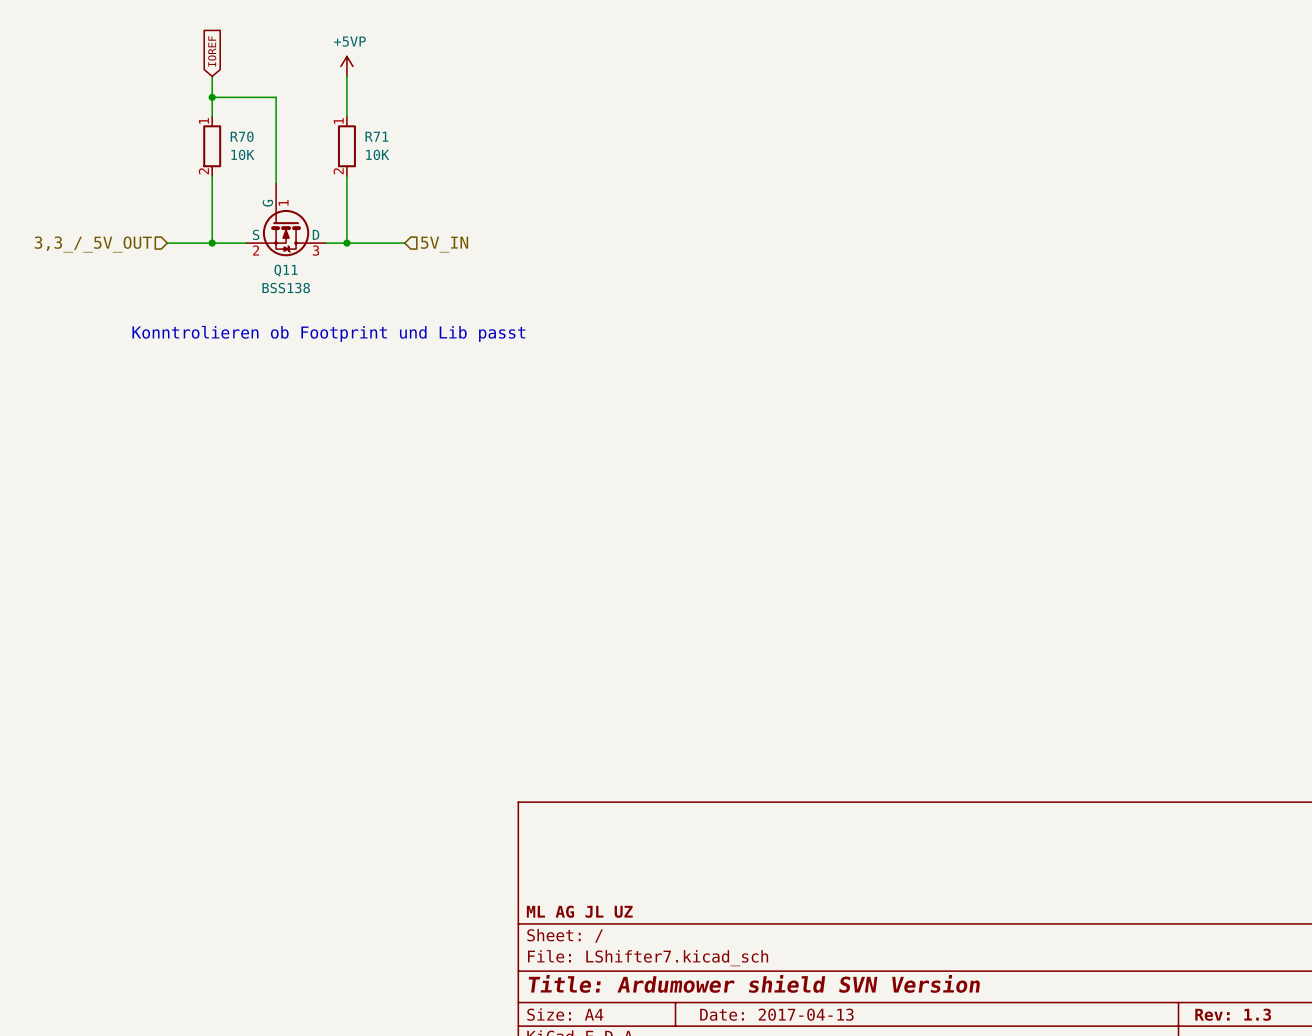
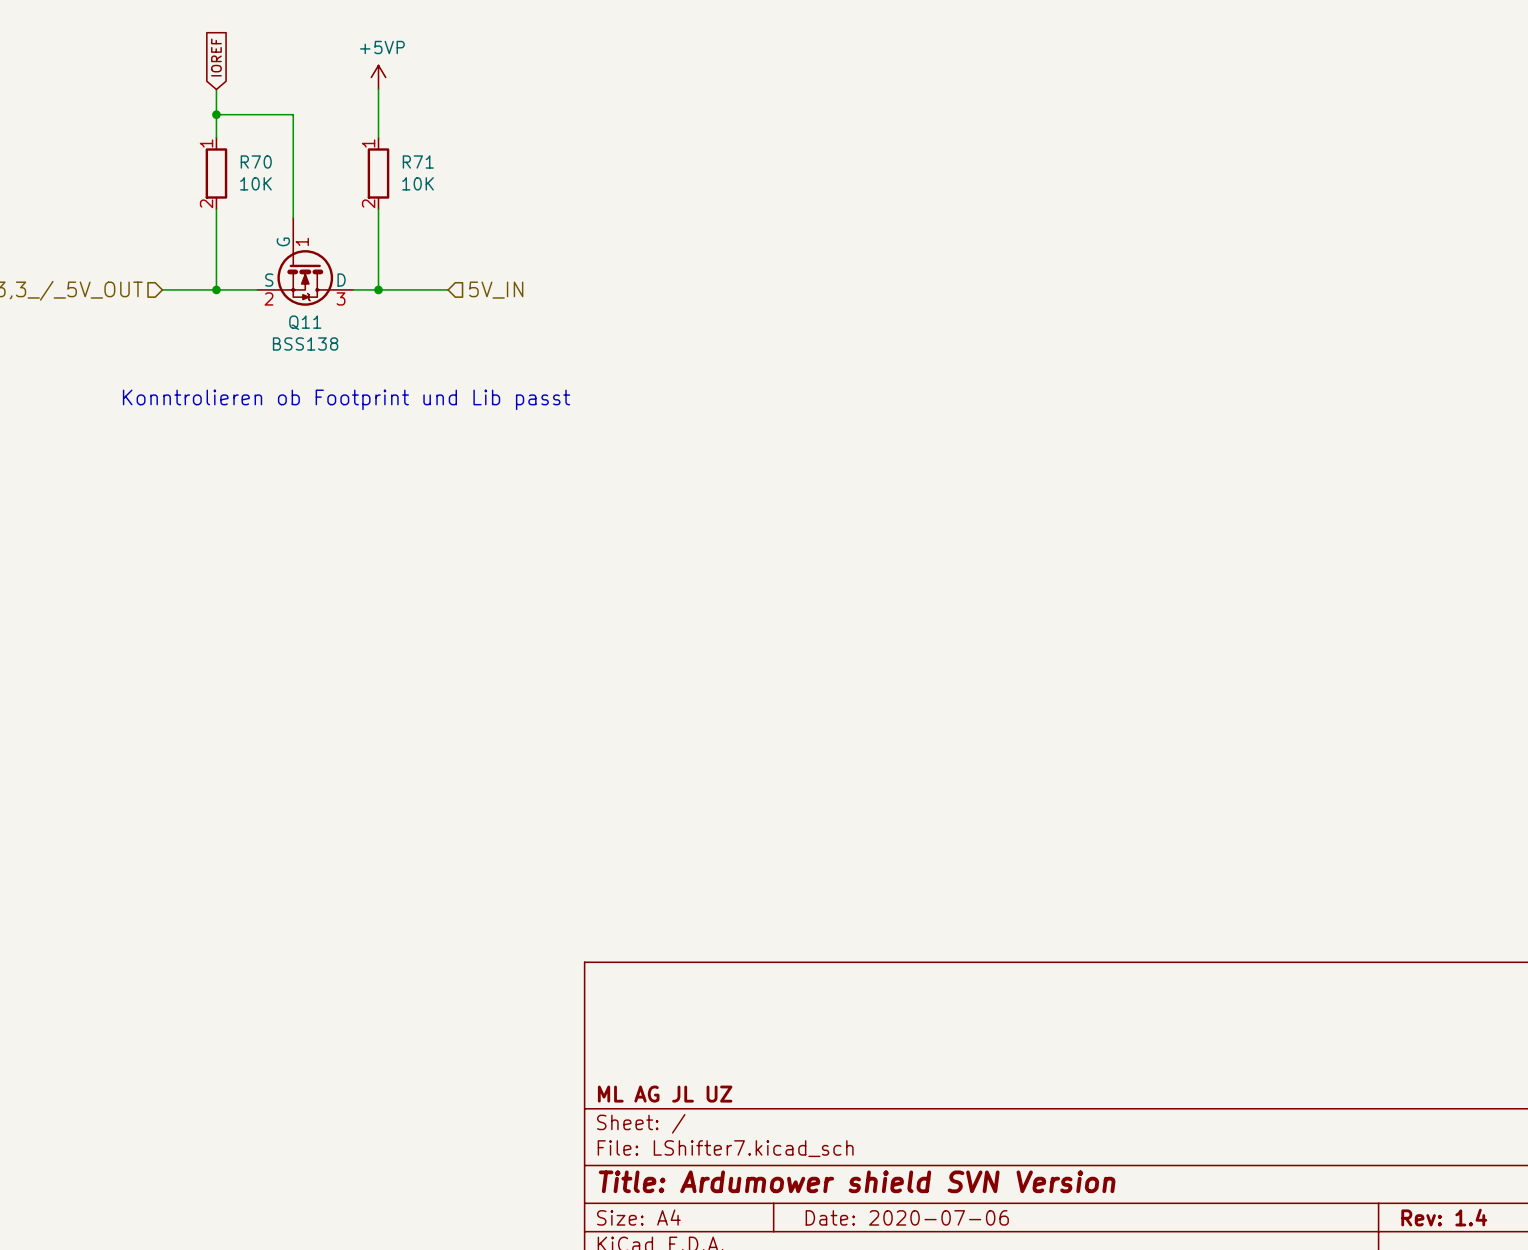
title block: Date: 2017-04-13 (776, 1014) -> Date: 2020-07-06 (907, 1217)
title block: Rev: 1.3 (1233, 1014) -> Rev: 1.4 (1444, 1217)

